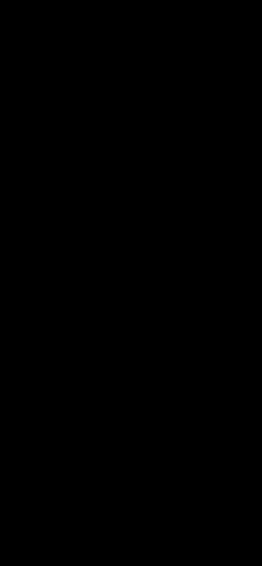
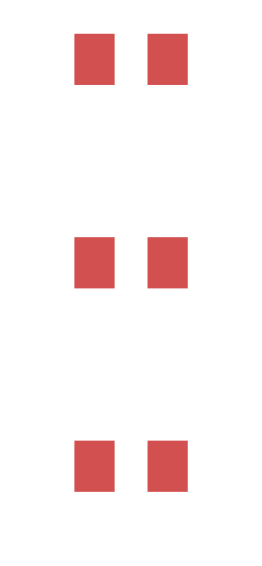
part: none -> (131, 59)
part: none -> (131, 262)
part: none -> (131, 466)

